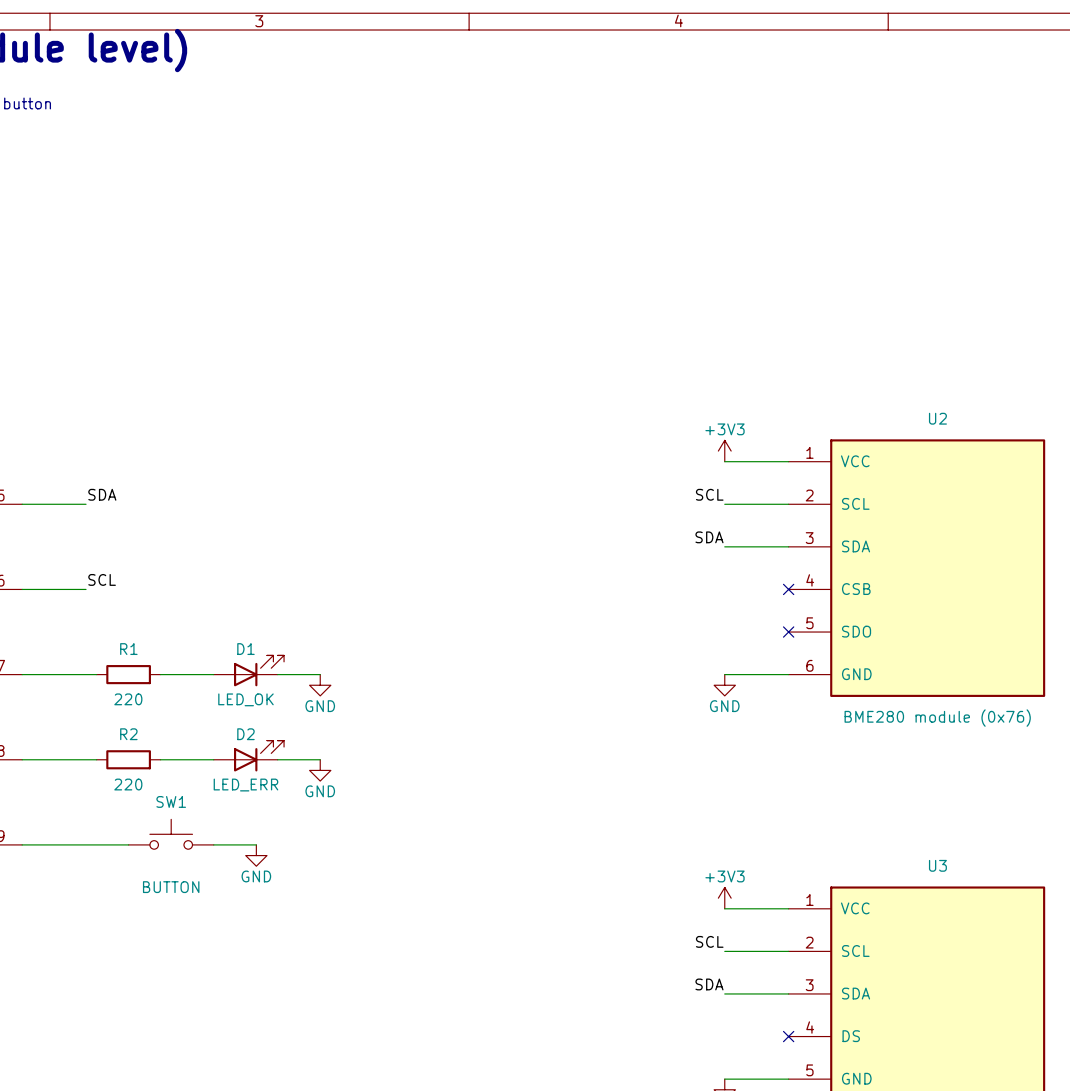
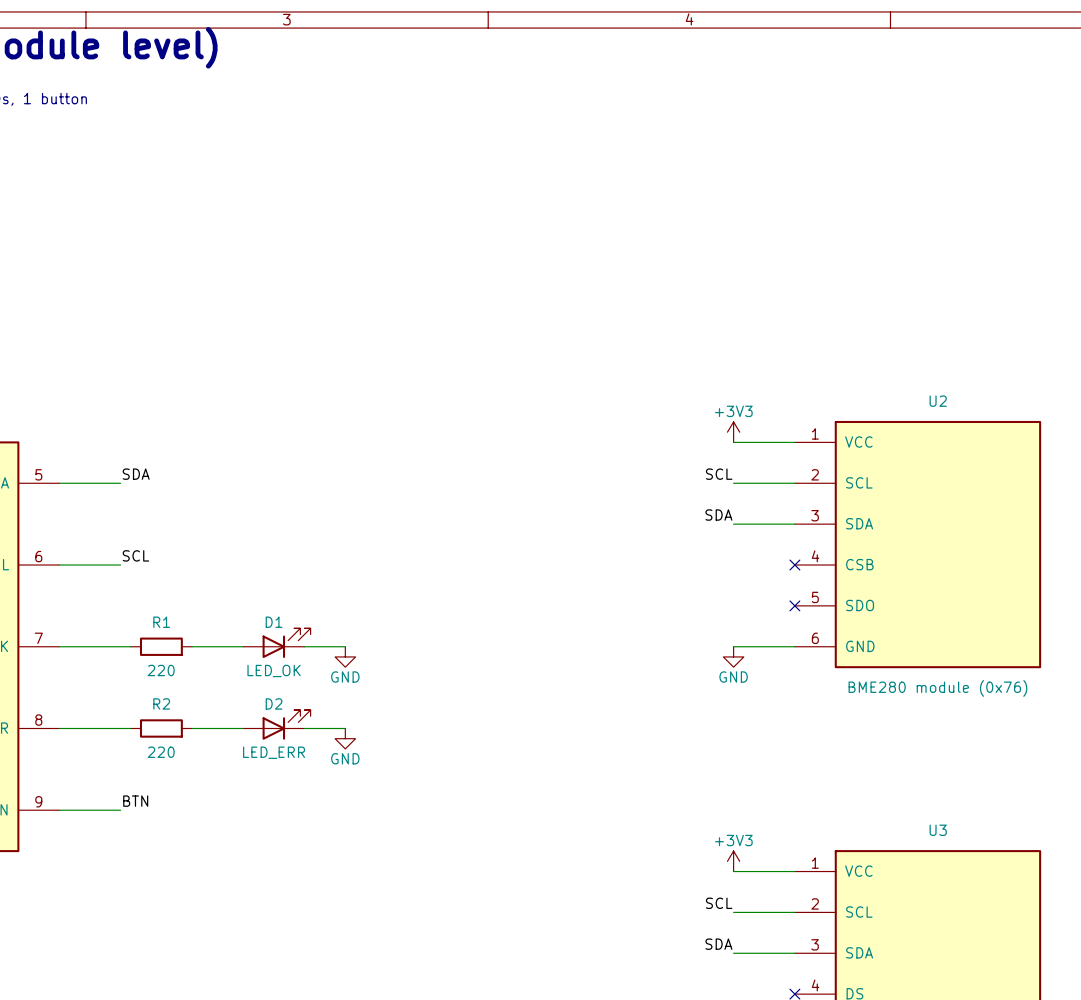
SW1: BUTTON (171, 834) -> none
label: none -> BTN (135, 801)
wire: (86, 844) (128, 844) -> none
wire: (213, 844) (256, 844) -> none
power symbol: GND (256, 855) -> none

